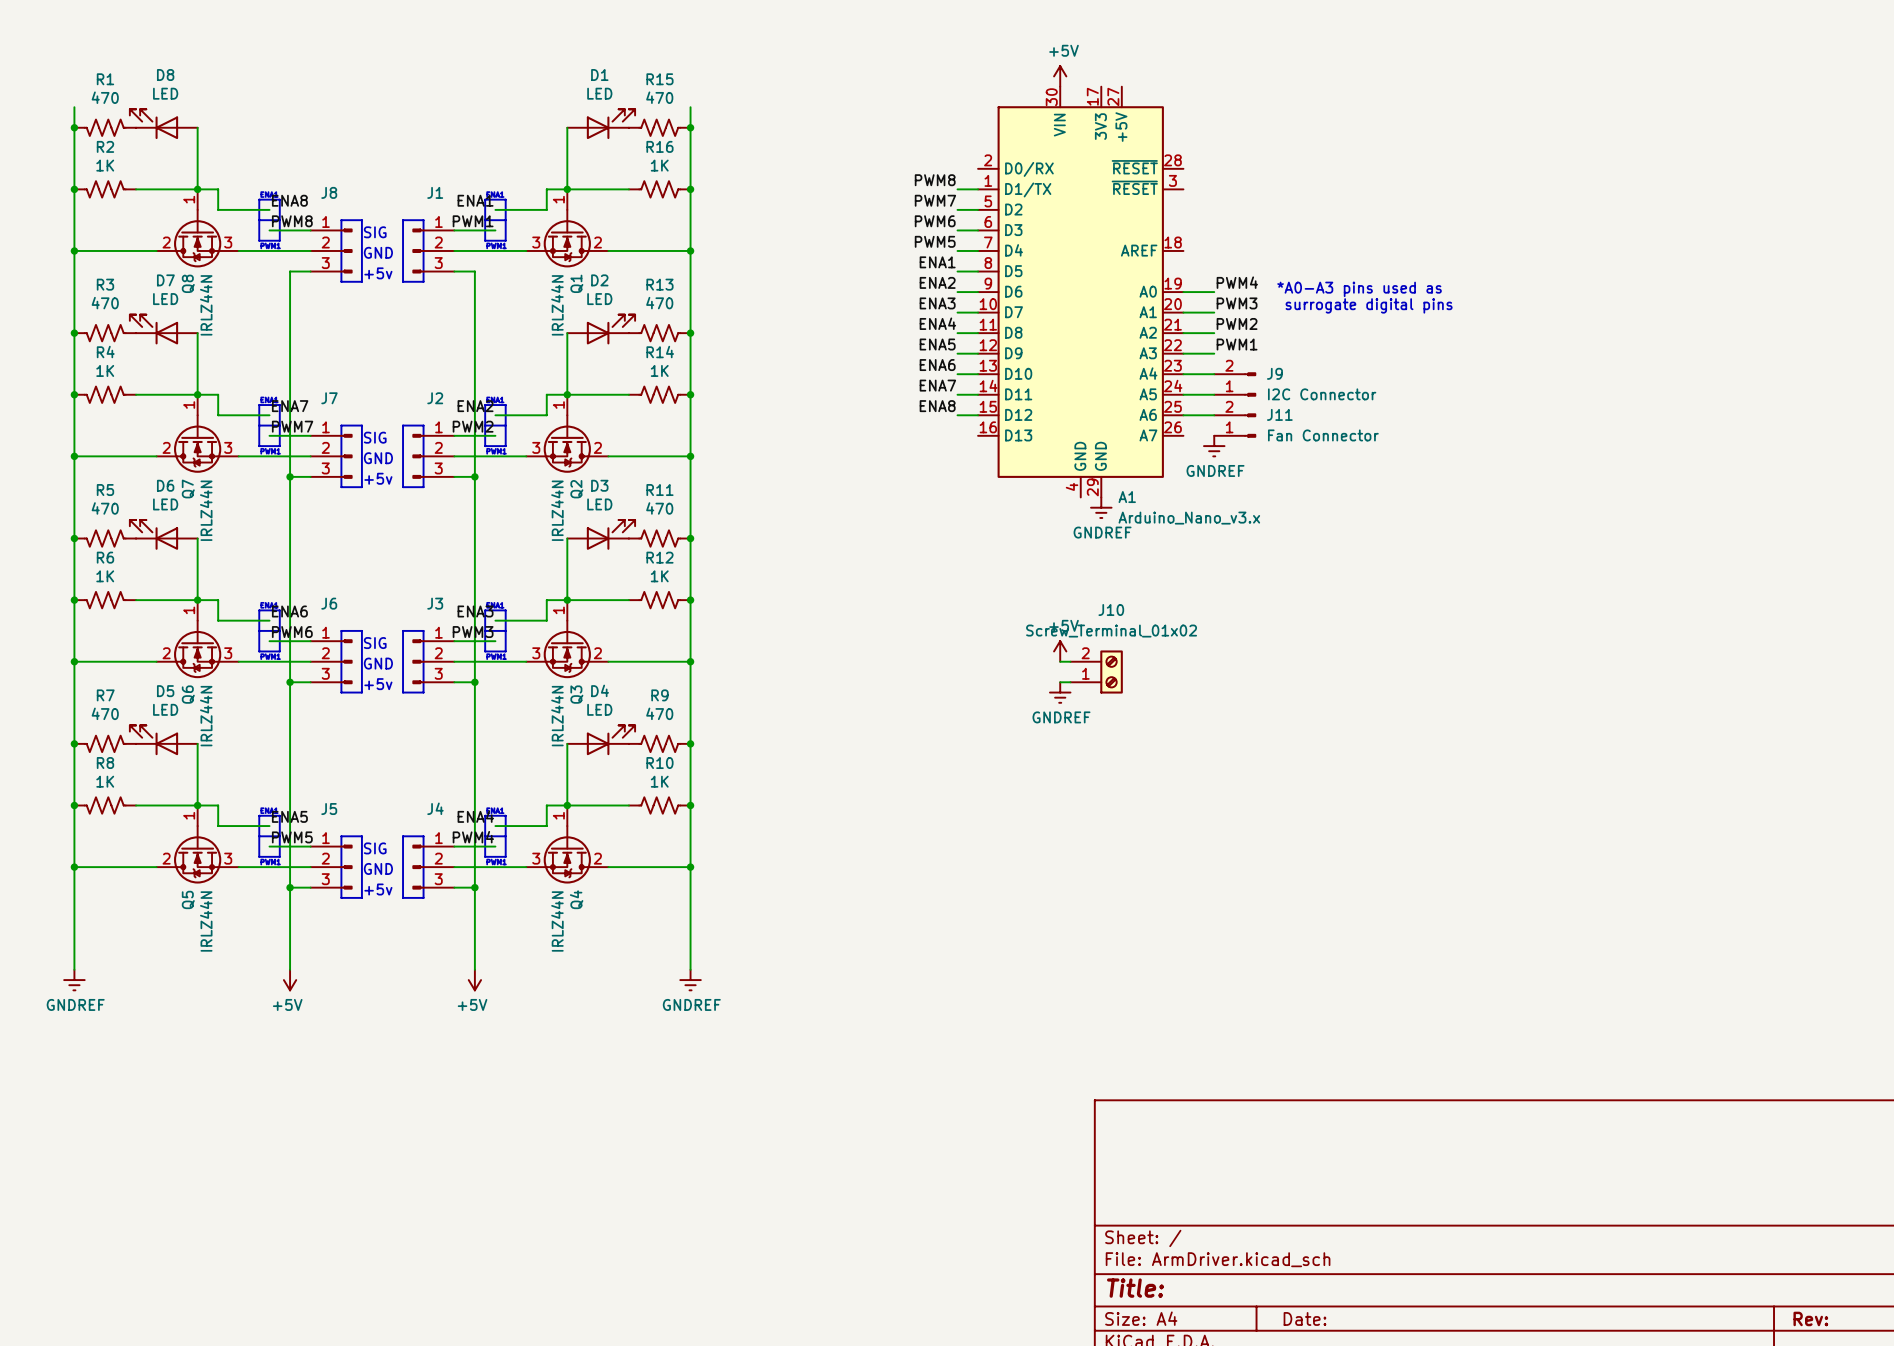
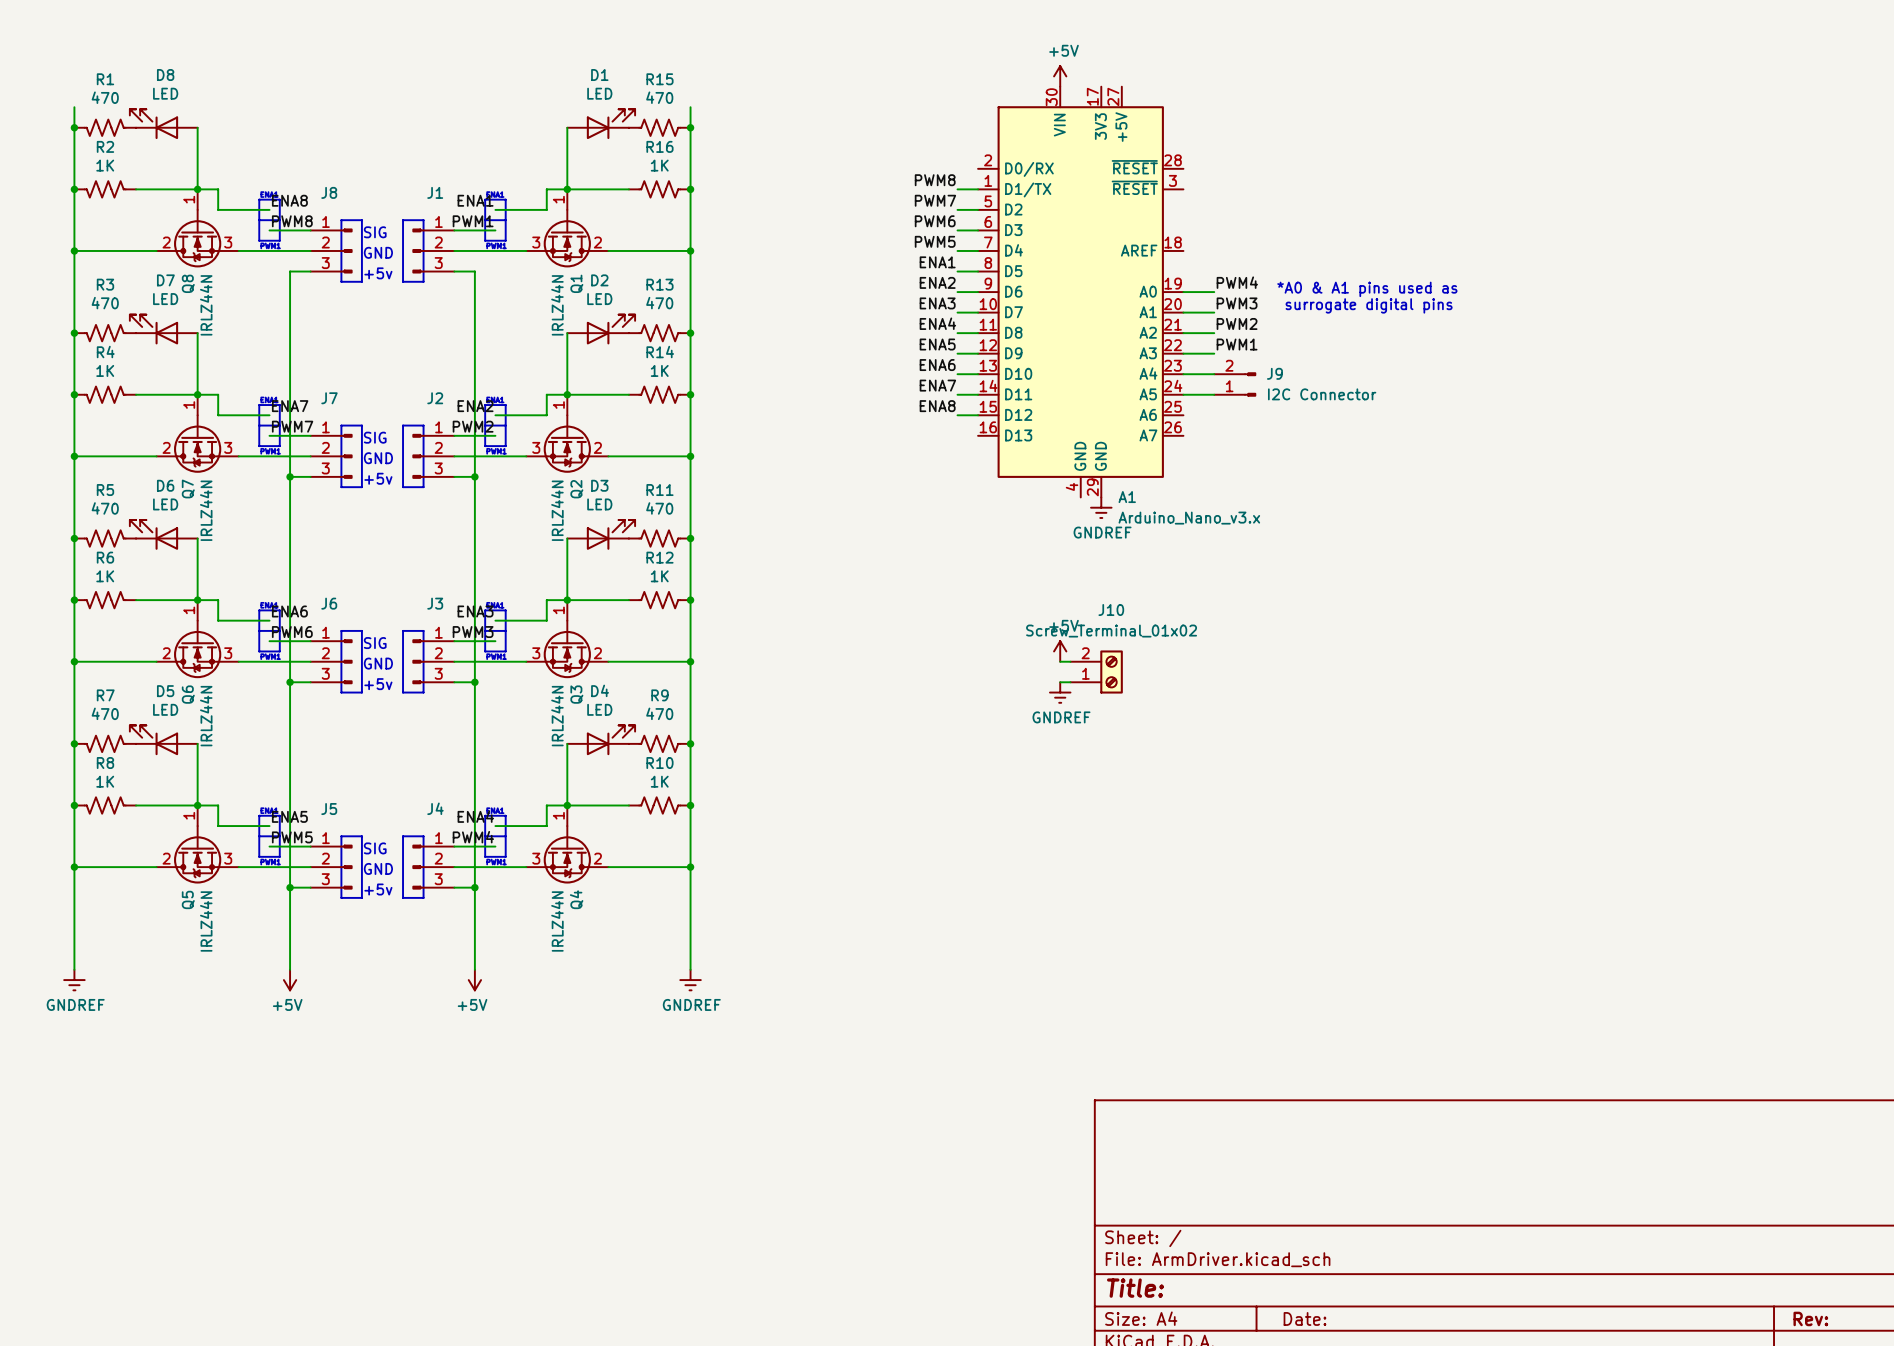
text: *A0-A3 pins used as (1359, 289) -> *A0 & A1 pins used as (1367, 289)
wire: (1183, 415) (1214, 415) -> none
J11: Fan Connector (1235, 425) -> none
power symbol: GNDREF (1214, 446) -> none

